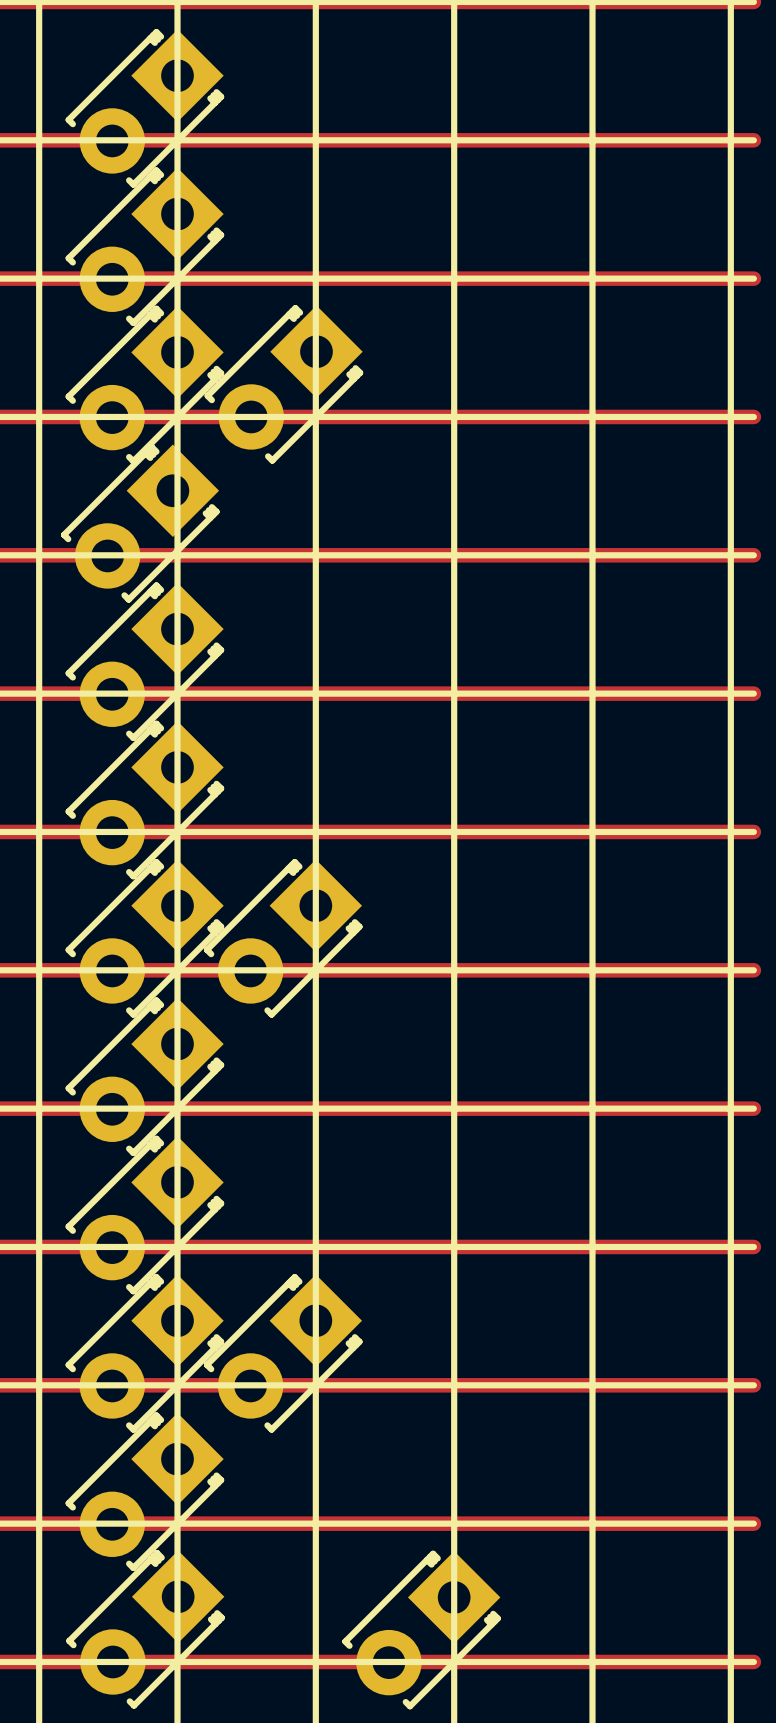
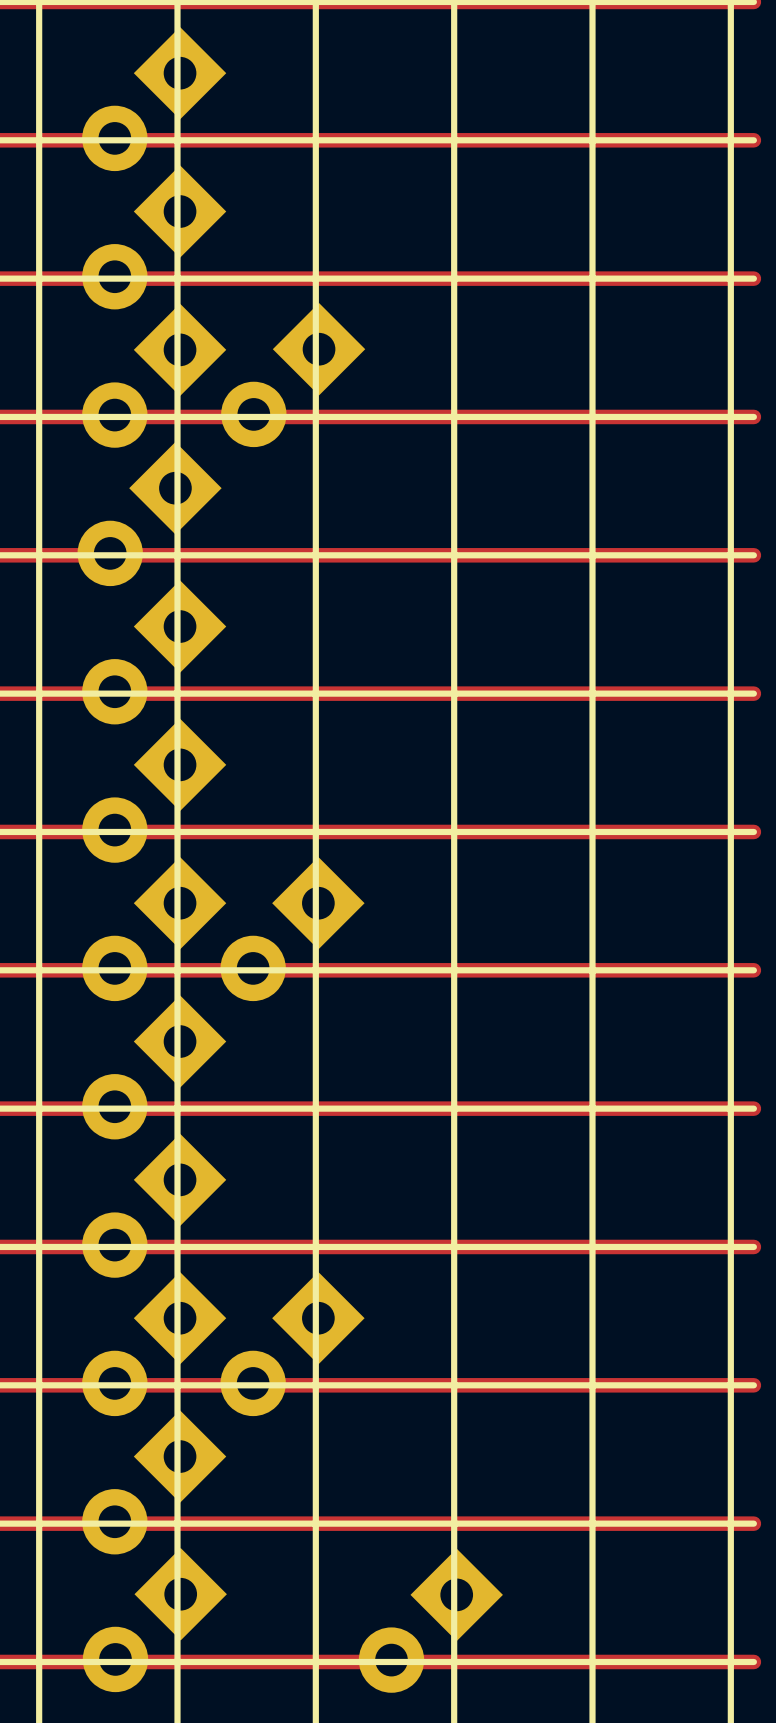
part footprint: [65, 29, 225, 188] -> [82, 26, 227, 172]
part footprint: [65, 167, 225, 327] -> [82, 165, 227, 310]
part footprint: [65, 305, 225, 465] -> [82, 303, 227, 448]
part footprint: [204, 305, 364, 464] -> [221, 302, 366, 448]
part footprint: [60, 444, 220, 603] -> [77, 441, 222, 587]
part footprint: [65, 582, 225, 742] -> [82, 580, 227, 725]
part footprint: [65, 720, 225, 880] -> [82, 718, 227, 863]
part footprint: [65, 859, 225, 1018] -> [82, 856, 227, 1002]
part footprint: [203, 859, 363, 1018] -> [220, 856, 365, 1002]
part footprint: [65, 997, 225, 1157] -> [82, 995, 227, 1140]
part footprint: [65, 1135, 225, 1295] -> [82, 1133, 227, 1278]
part footprint: [65, 1274, 225, 1433] -> [82, 1272, 227, 1417]
part footprint: [203, 1274, 363, 1433] -> [220, 1272, 365, 1417]
part footprint: [65, 1412, 225, 1572] -> [82, 1410, 227, 1555]
part footprint: [66, 1550, 225, 1709] -> [82, 1548, 227, 1693]
part footprint: [342, 1550, 501, 1710] -> [358, 1548, 503, 1693]

